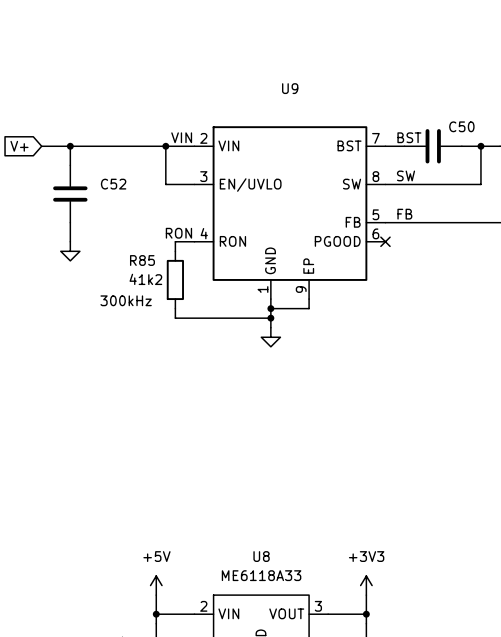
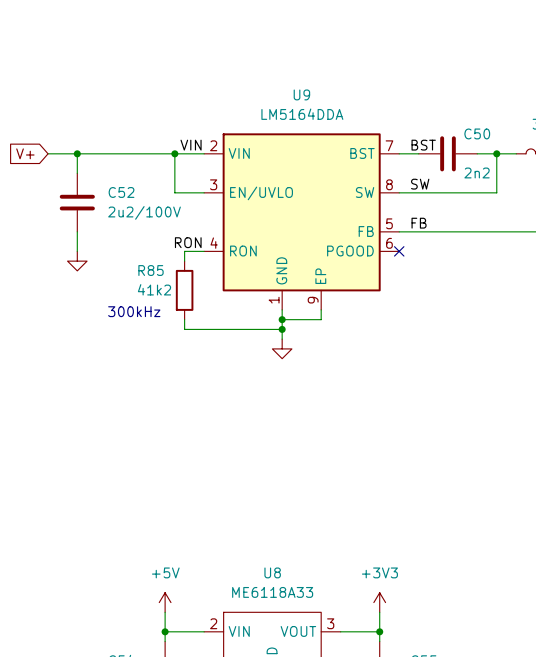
U9 value: none -> LM5164DDA (302, 114)
C50 value: none -> 2n2 (477, 172)
C52 value: none -> 2u2/100V (144, 212)

